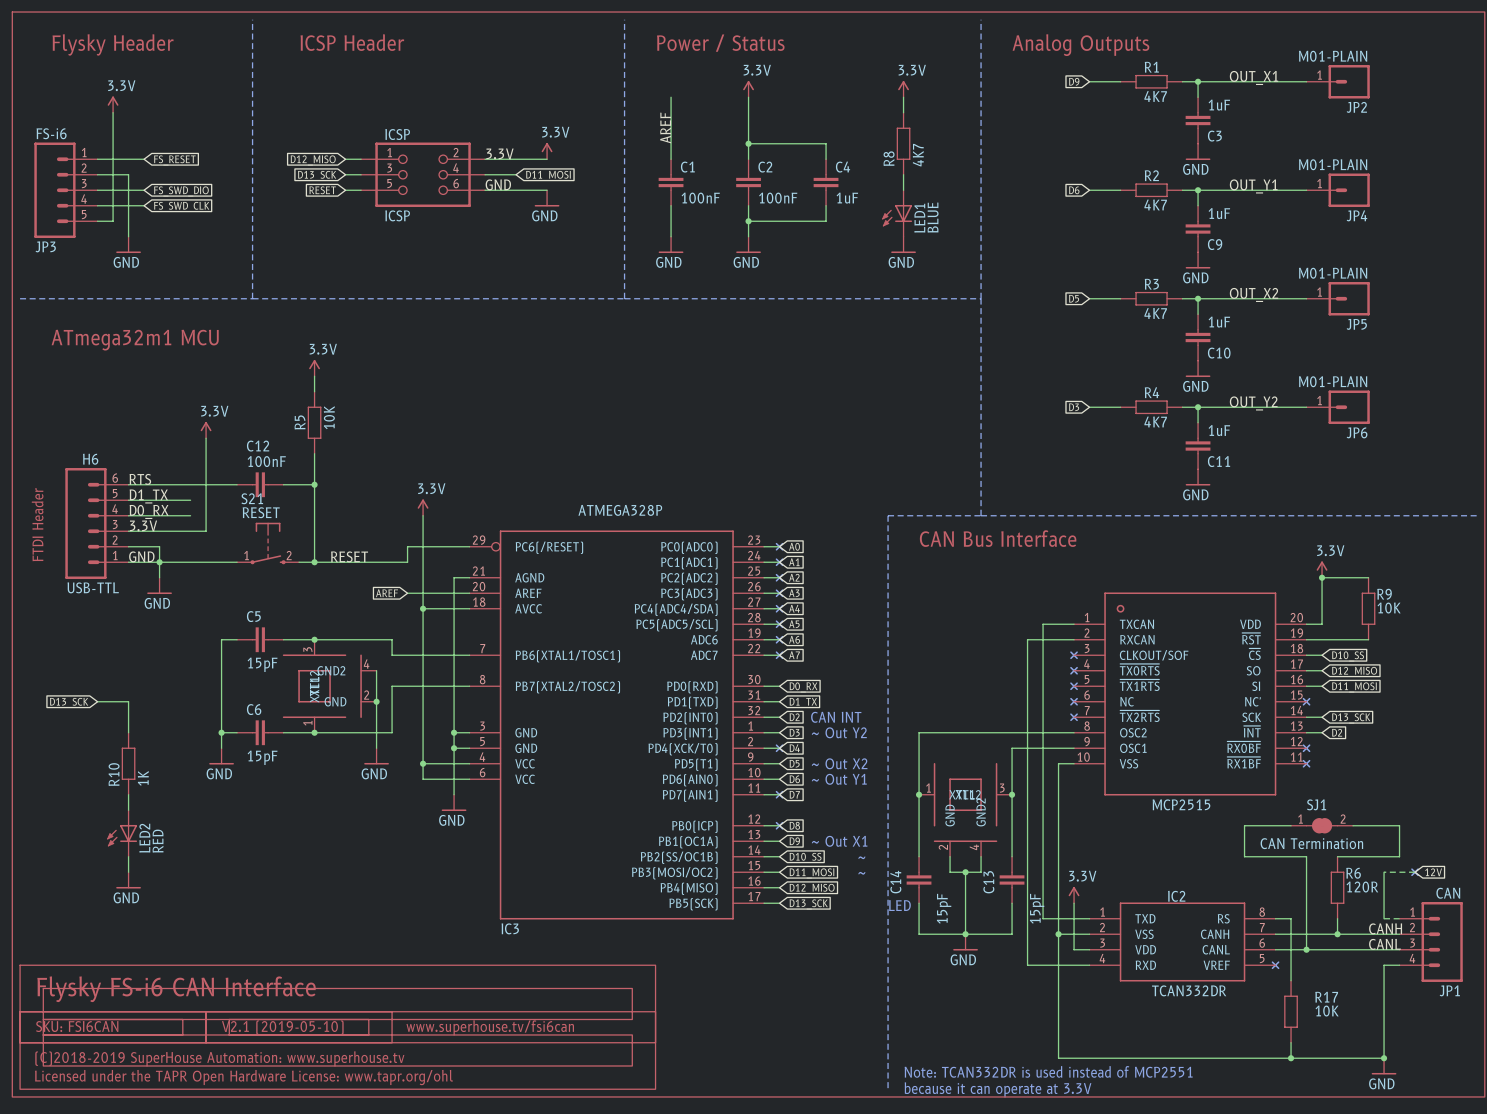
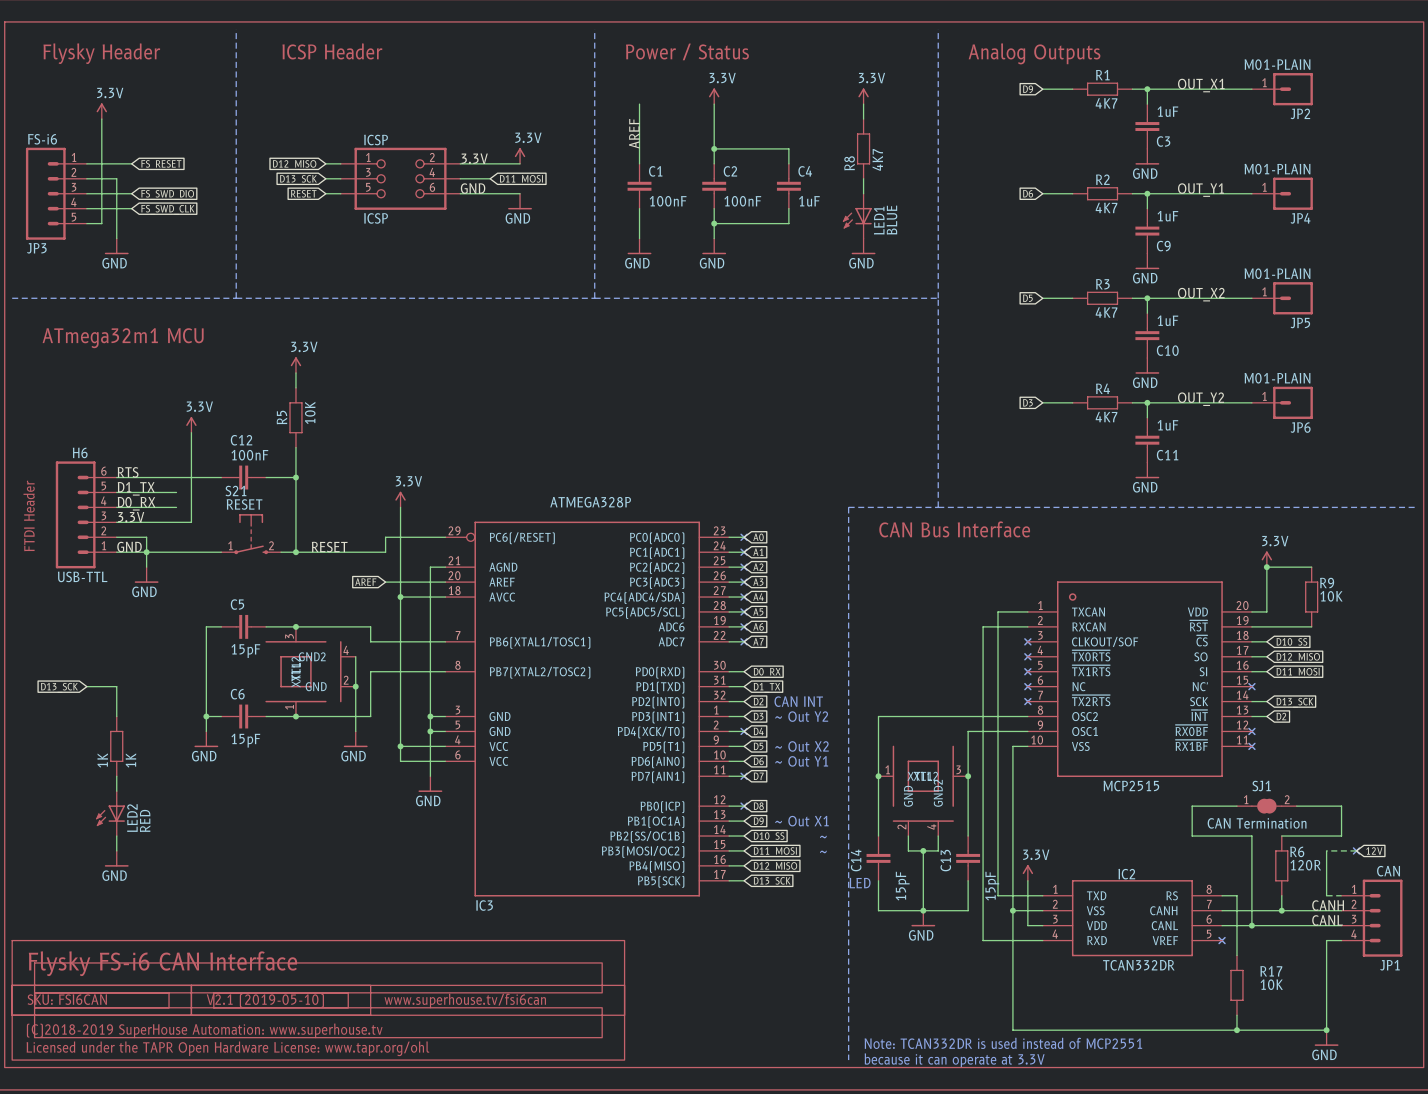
R10 name: R10 (114, 774) -> 1K (102, 760)

